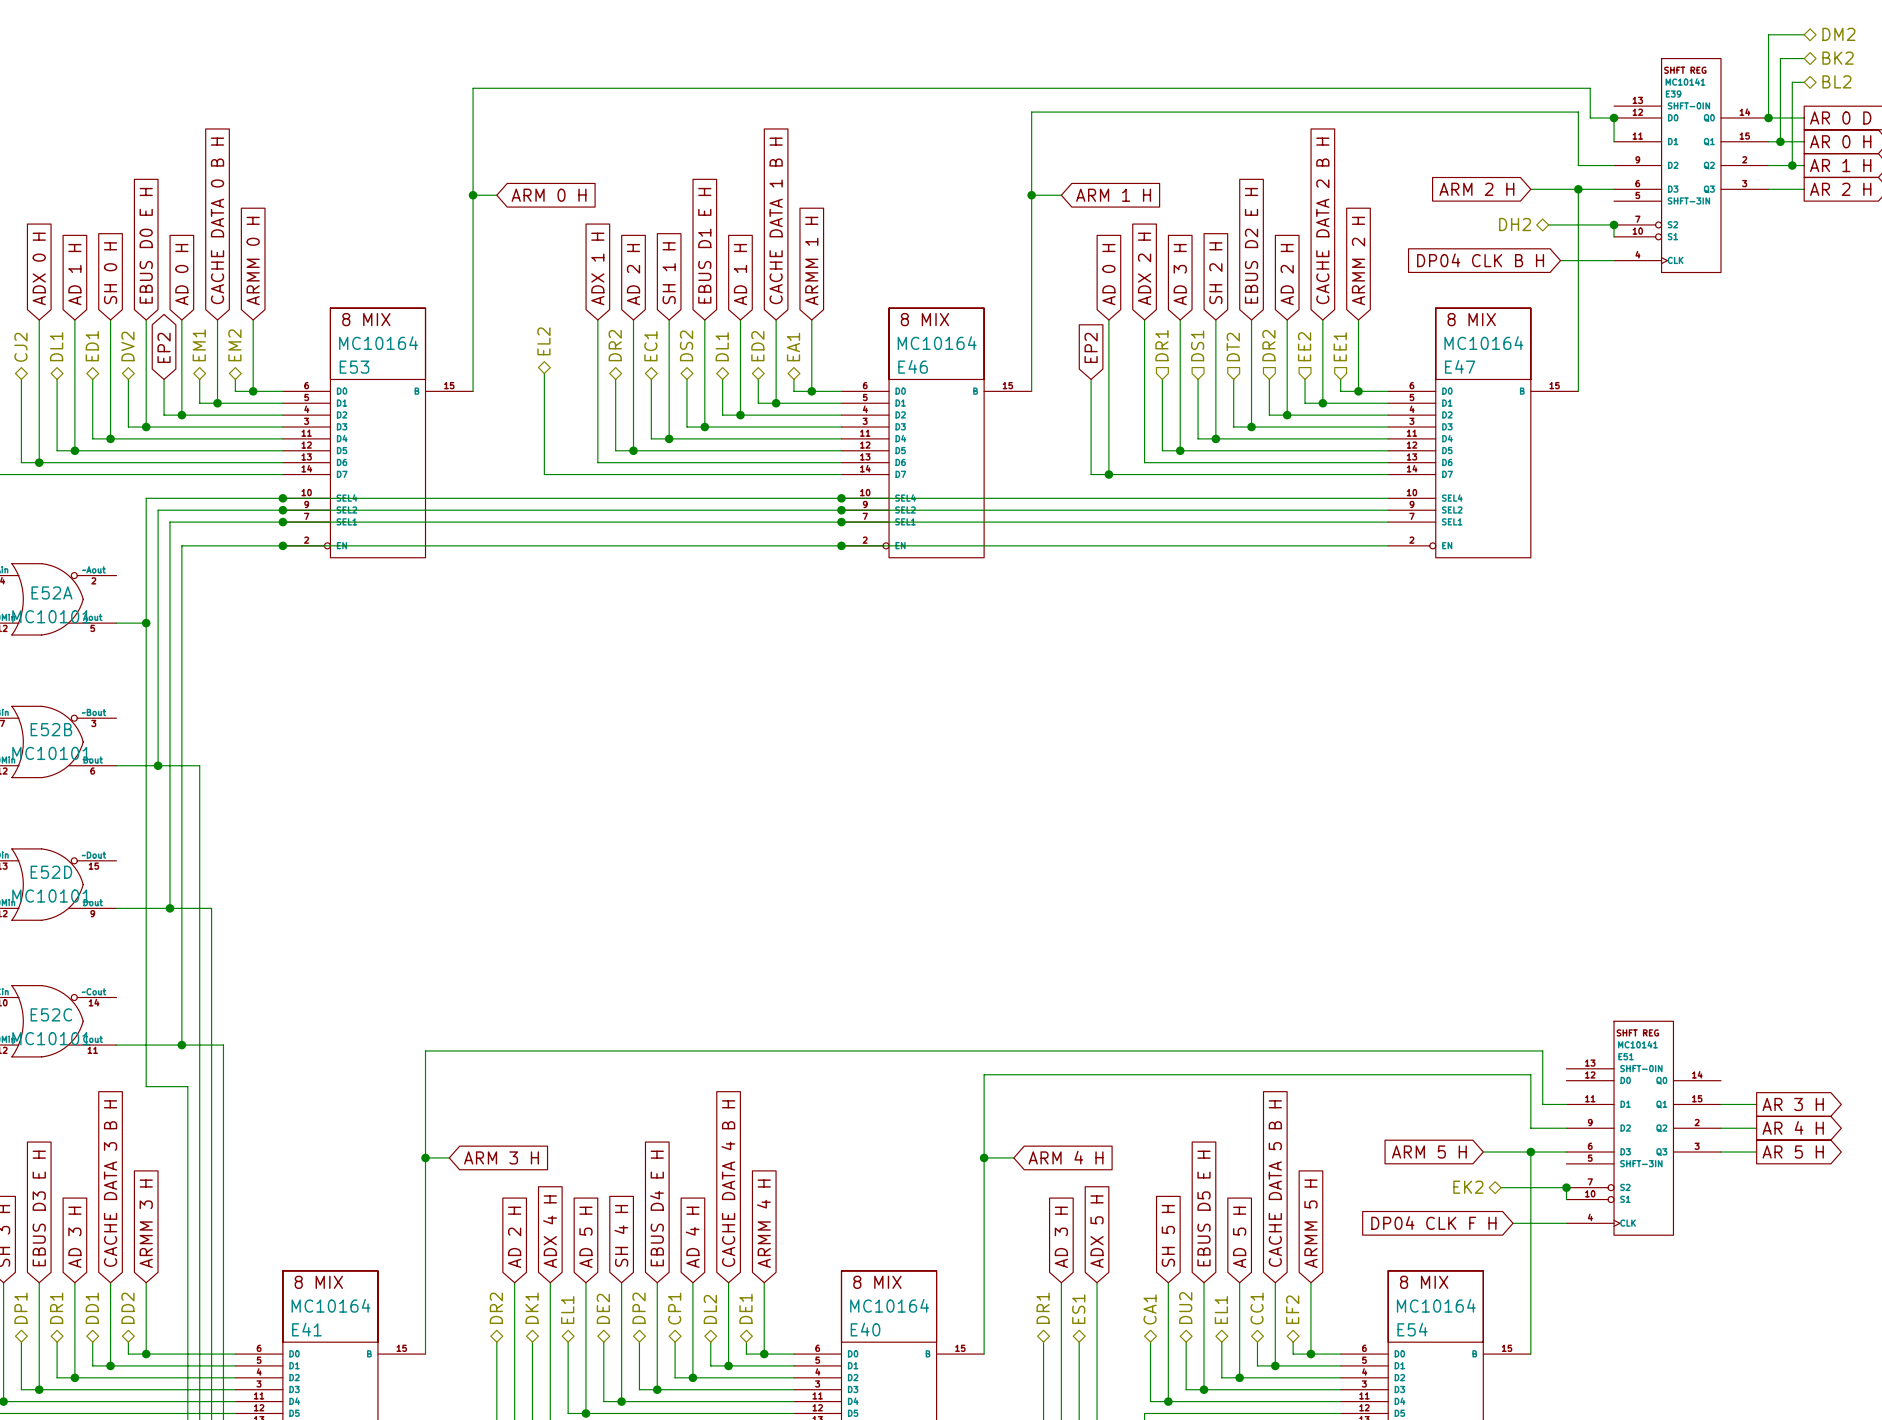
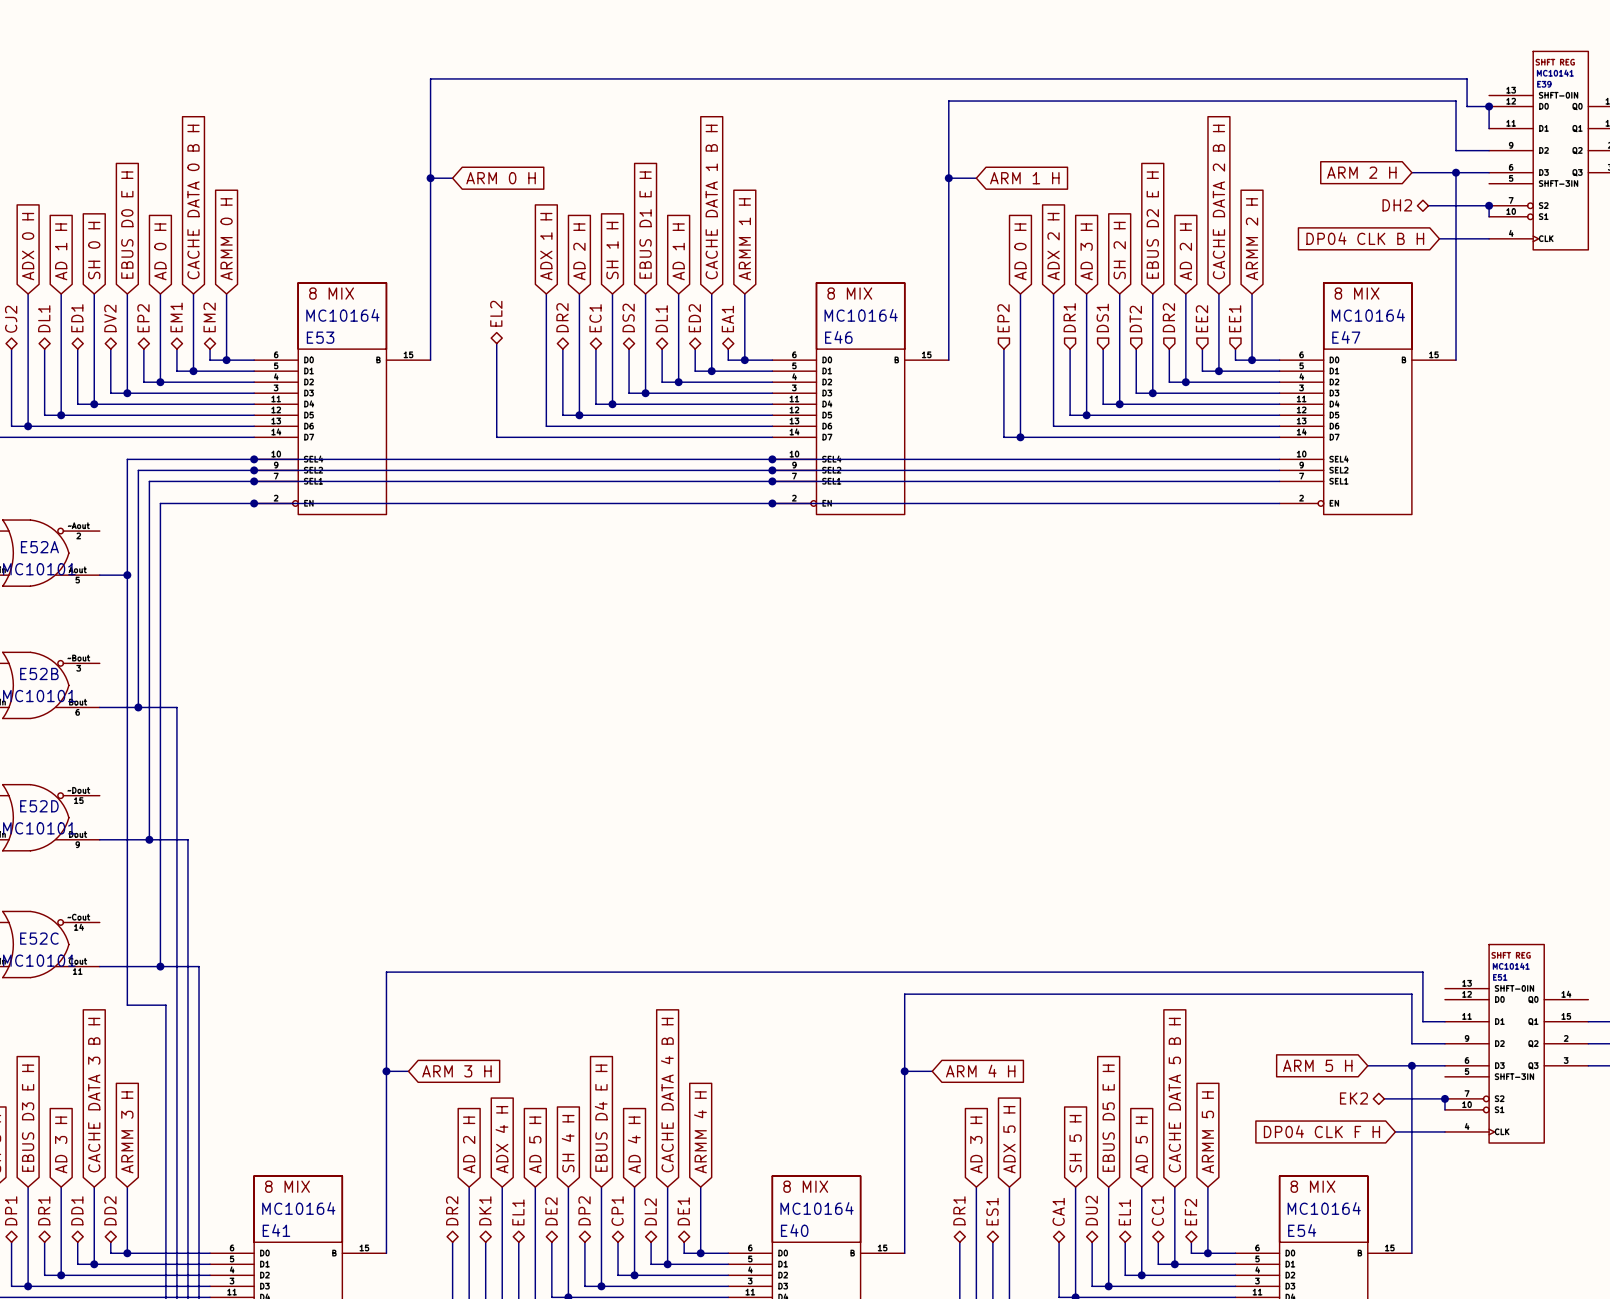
hierarchical label: none -> EP2 (143, 318)
hierarchical label: none -> EP2 (1003, 318)
global label: EP2 (164, 347) -> none
global label: EP2 (1091, 347) -> none

